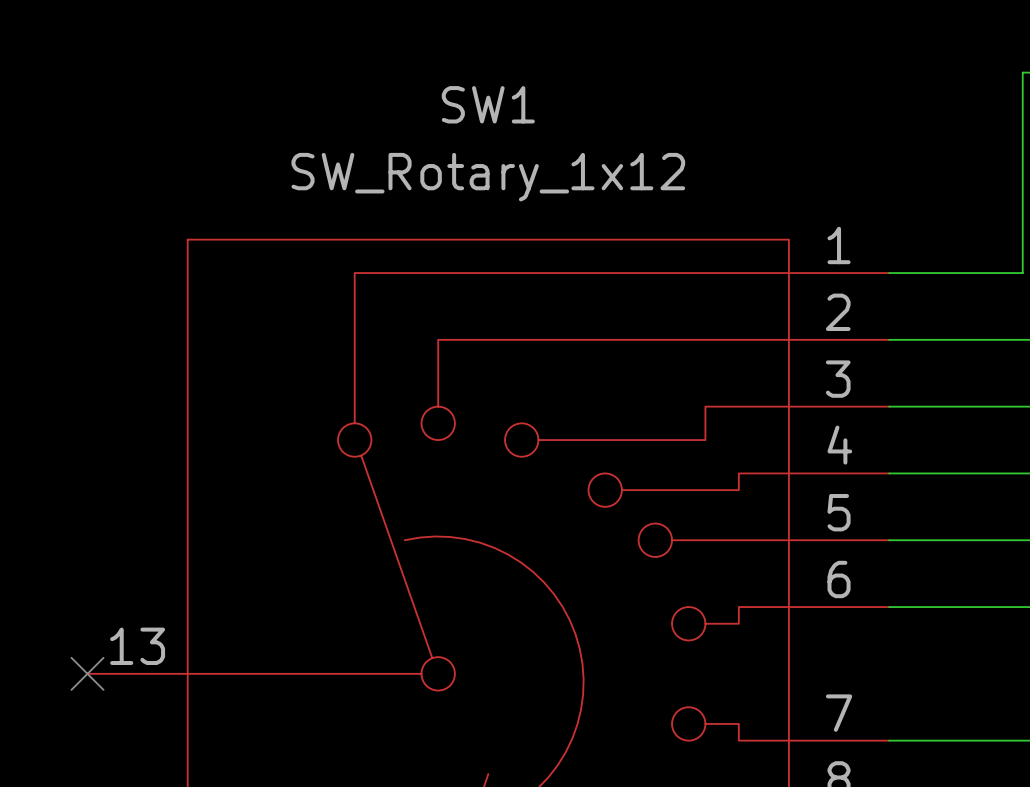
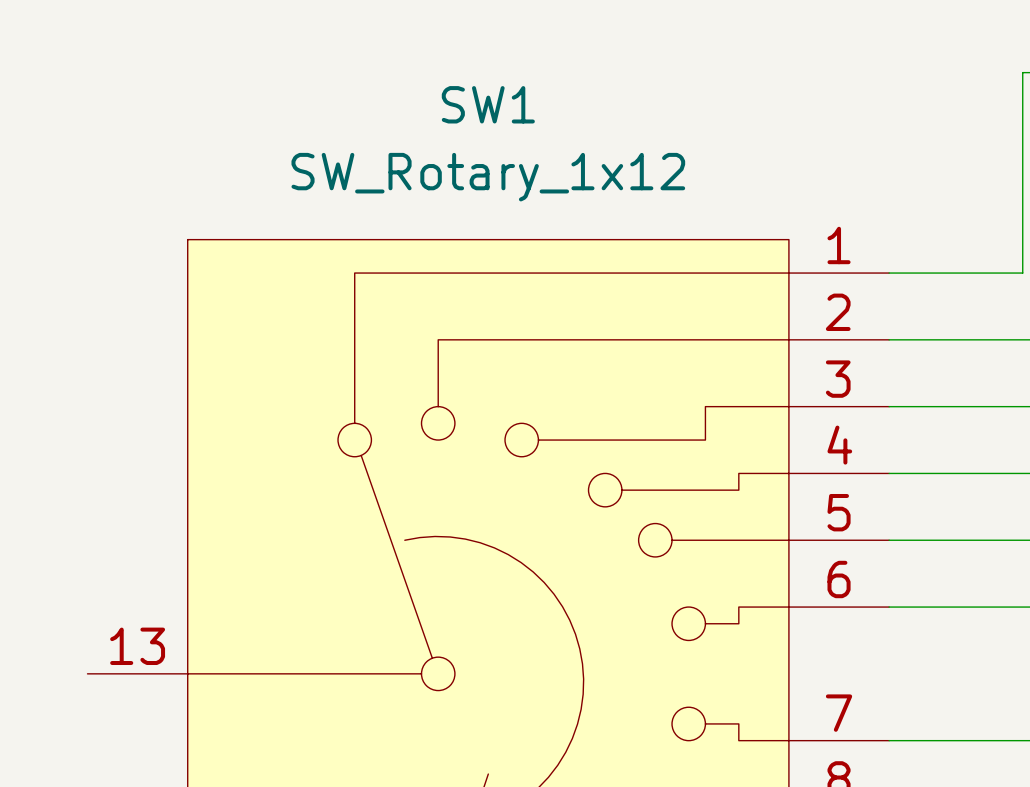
no-connect mark: (87, 673) -> none

